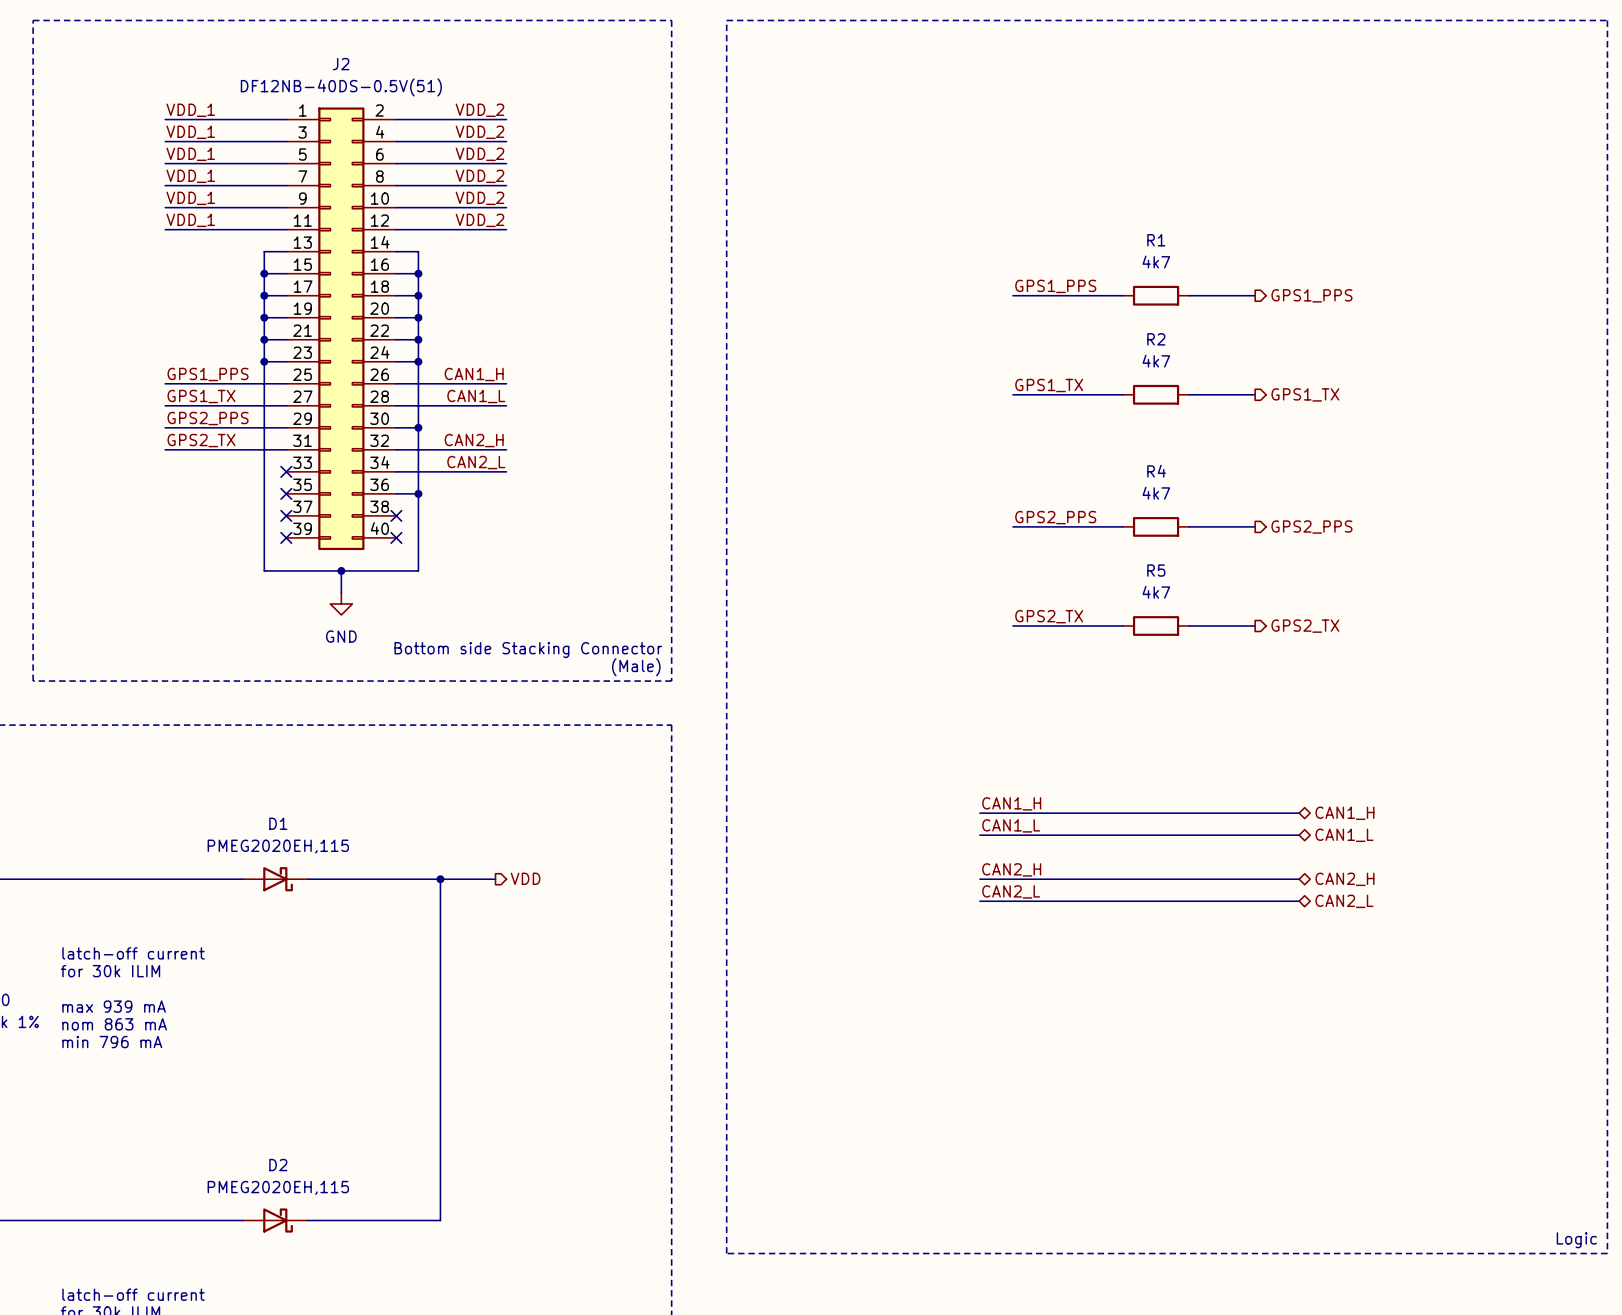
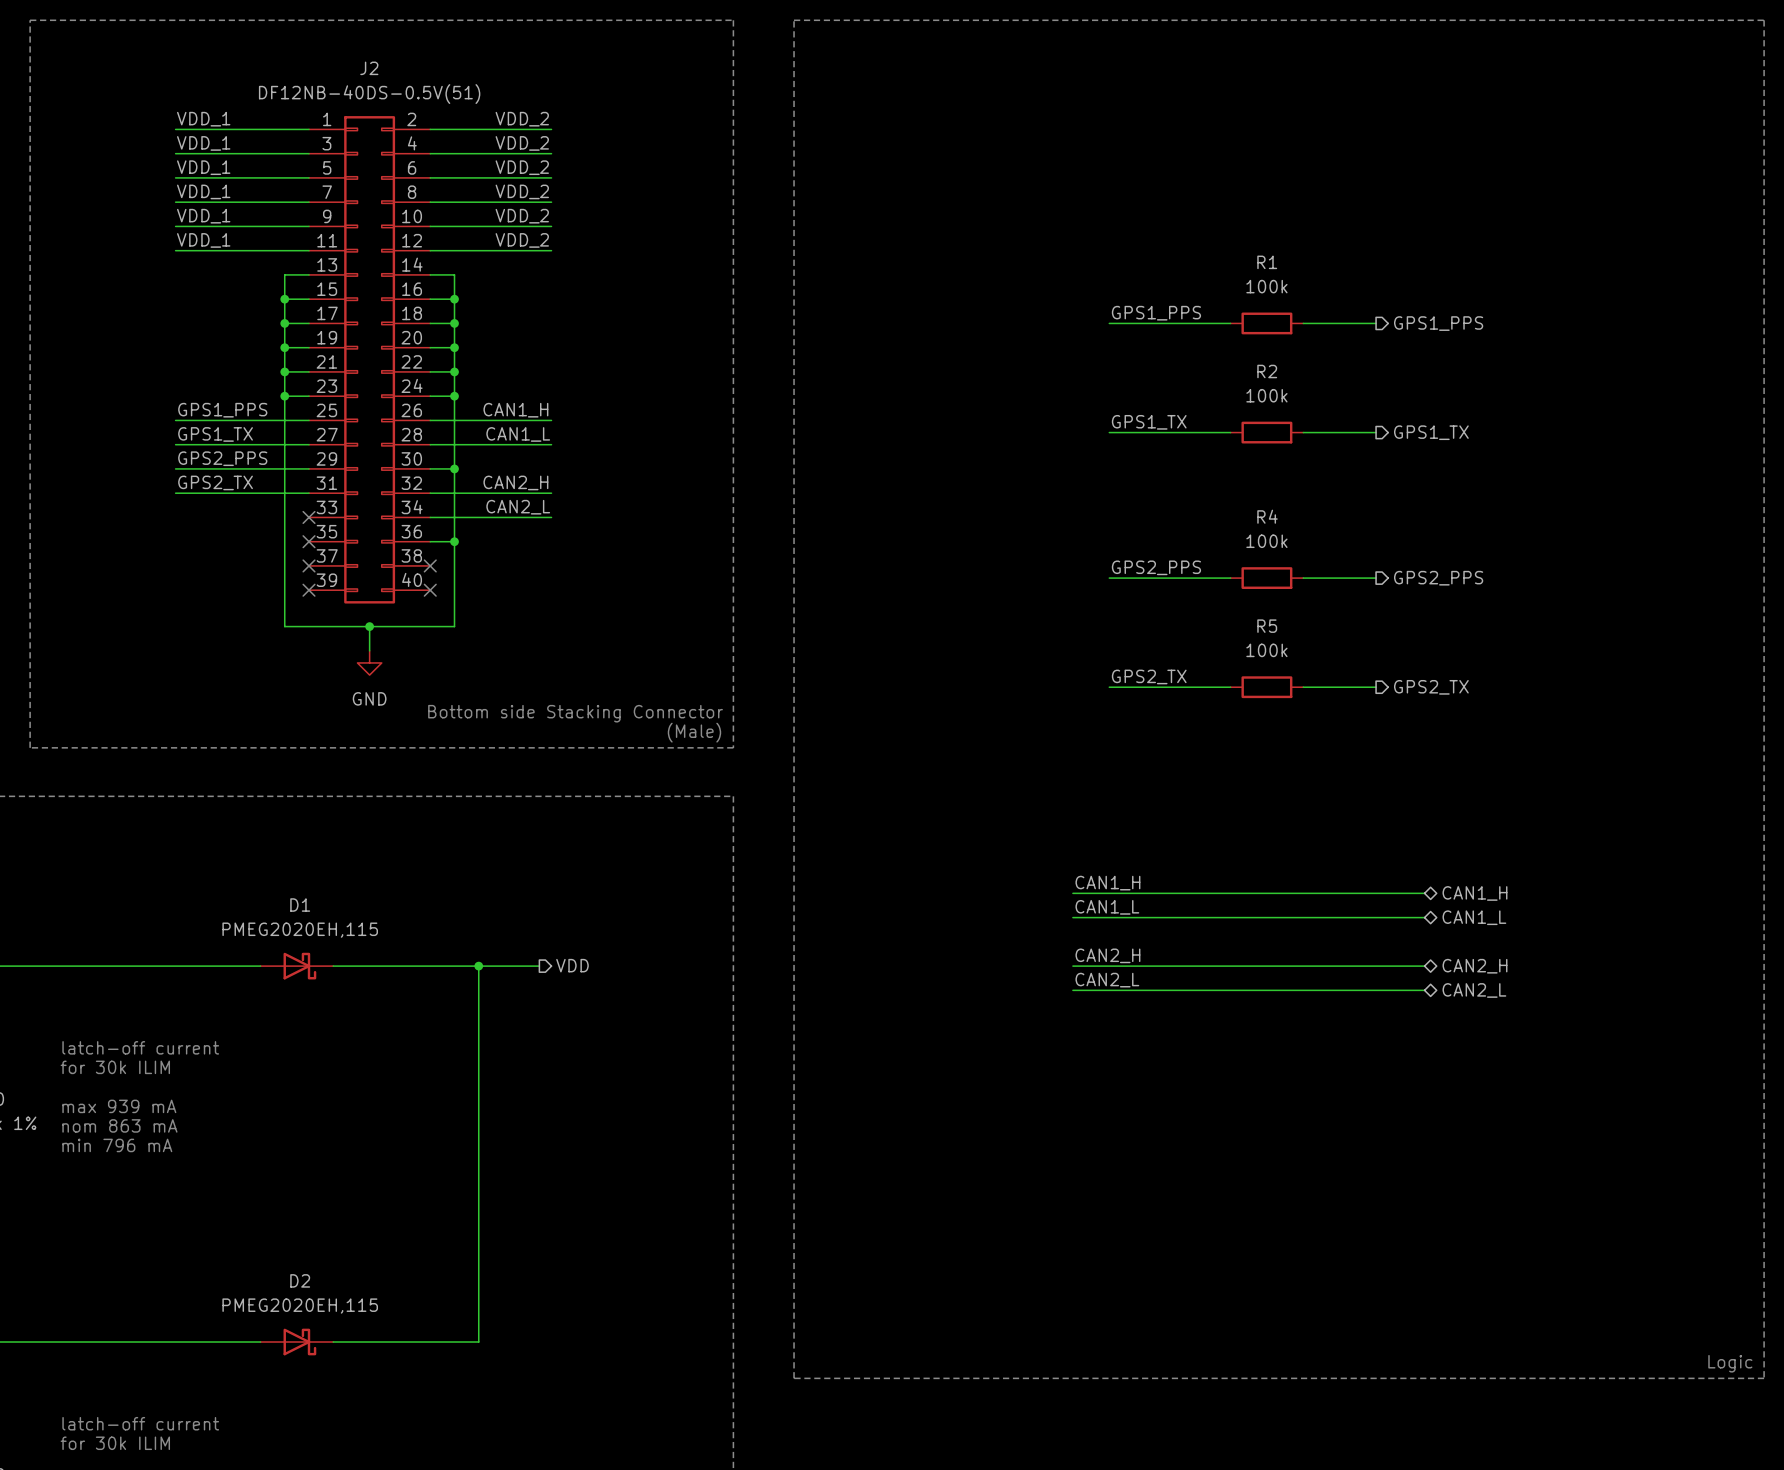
R1 value: 4k7 (1156, 262) -> 100k (1266, 286)
R2 value: 4k7 (1156, 361) -> 100k (1266, 395)
R4 value: 4k7 (1156, 493) -> 100k (1266, 541)
R5 value: 4k7 (1156, 592) -> 100k (1266, 650)

